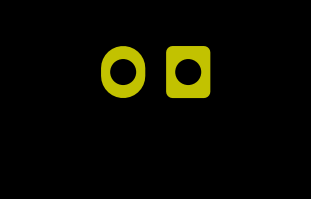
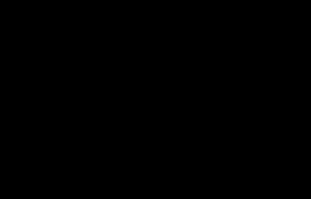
part: (155, 72) -> none

